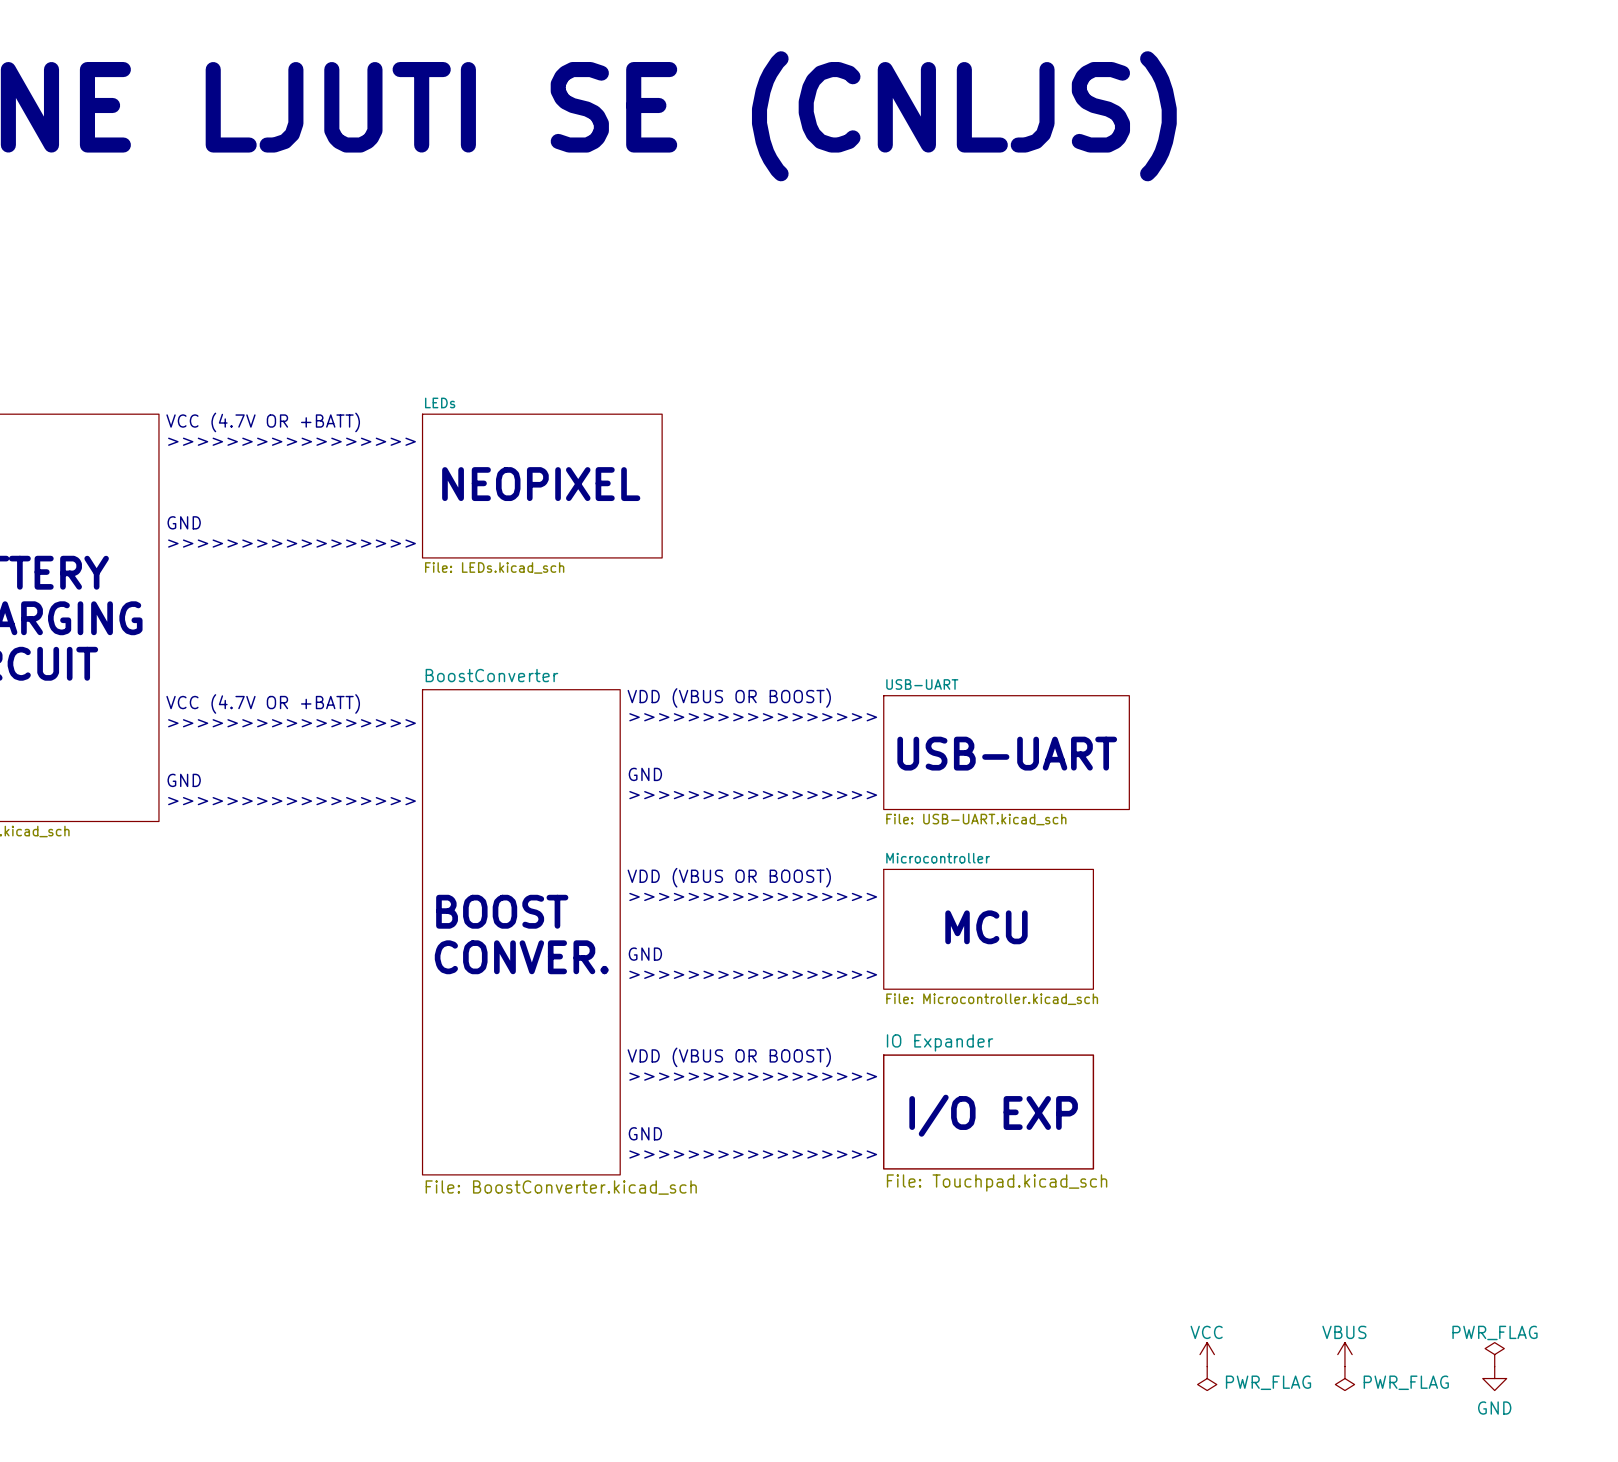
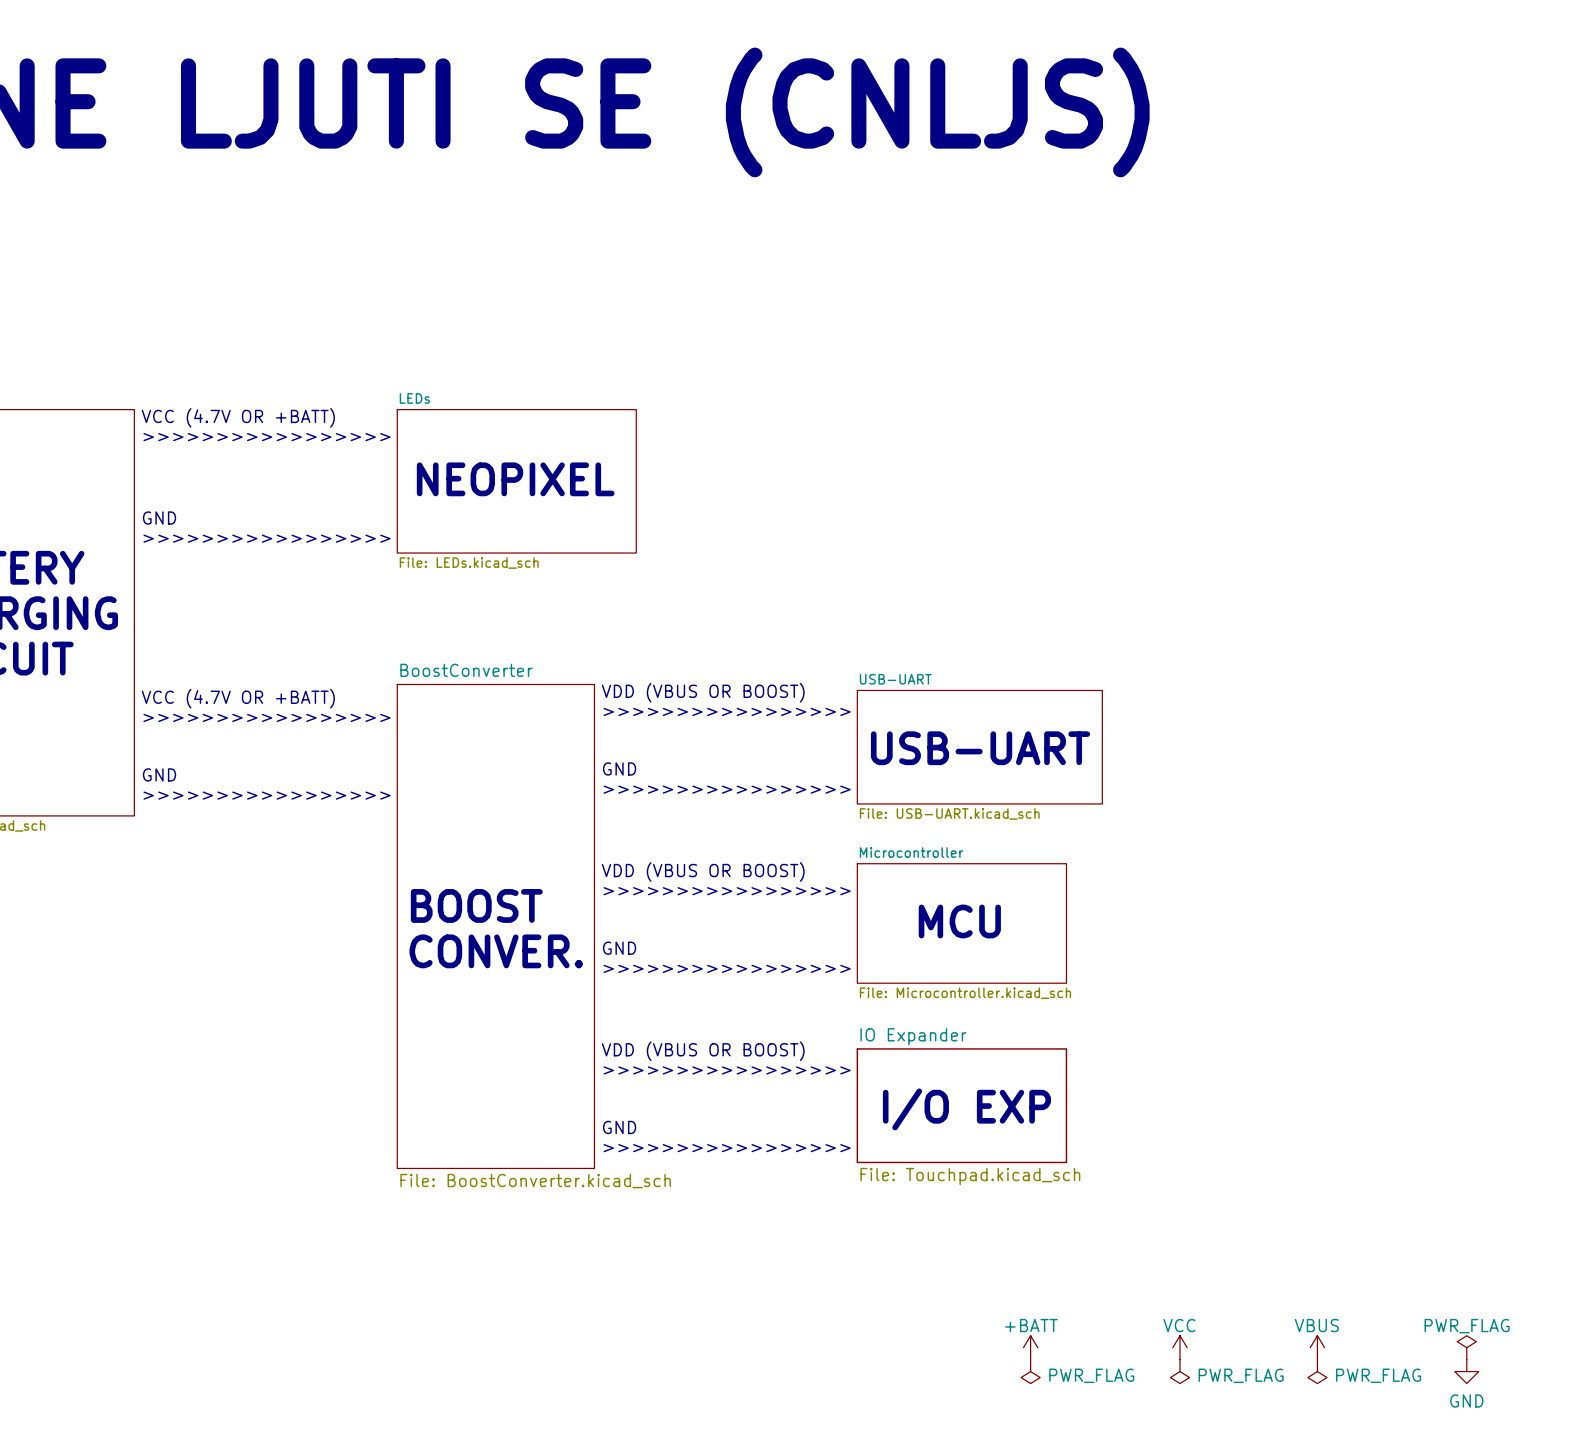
power symbol: none -> +BATT (1030, 1347)
power symbol: none -> PWR_FLAG (1030, 1371)

